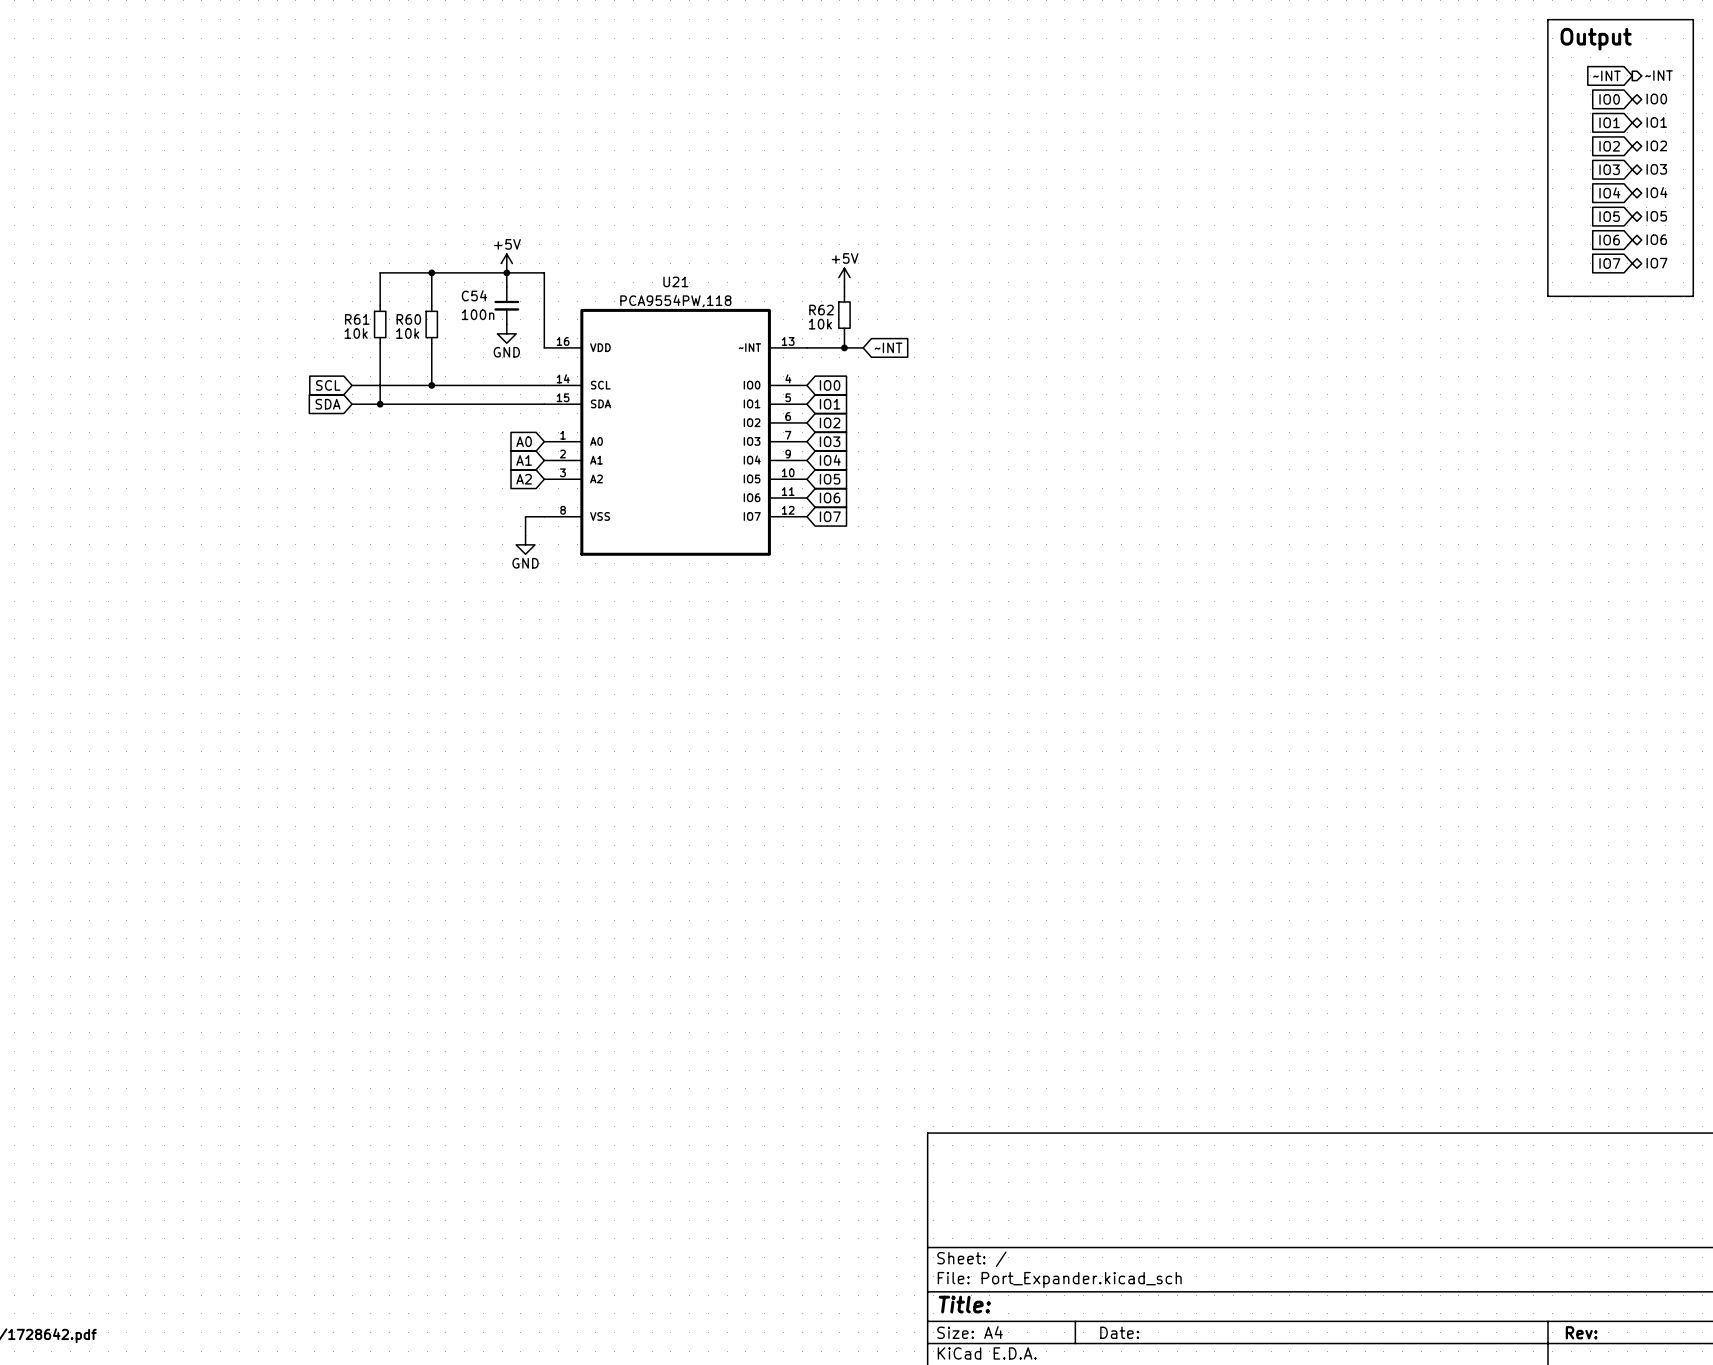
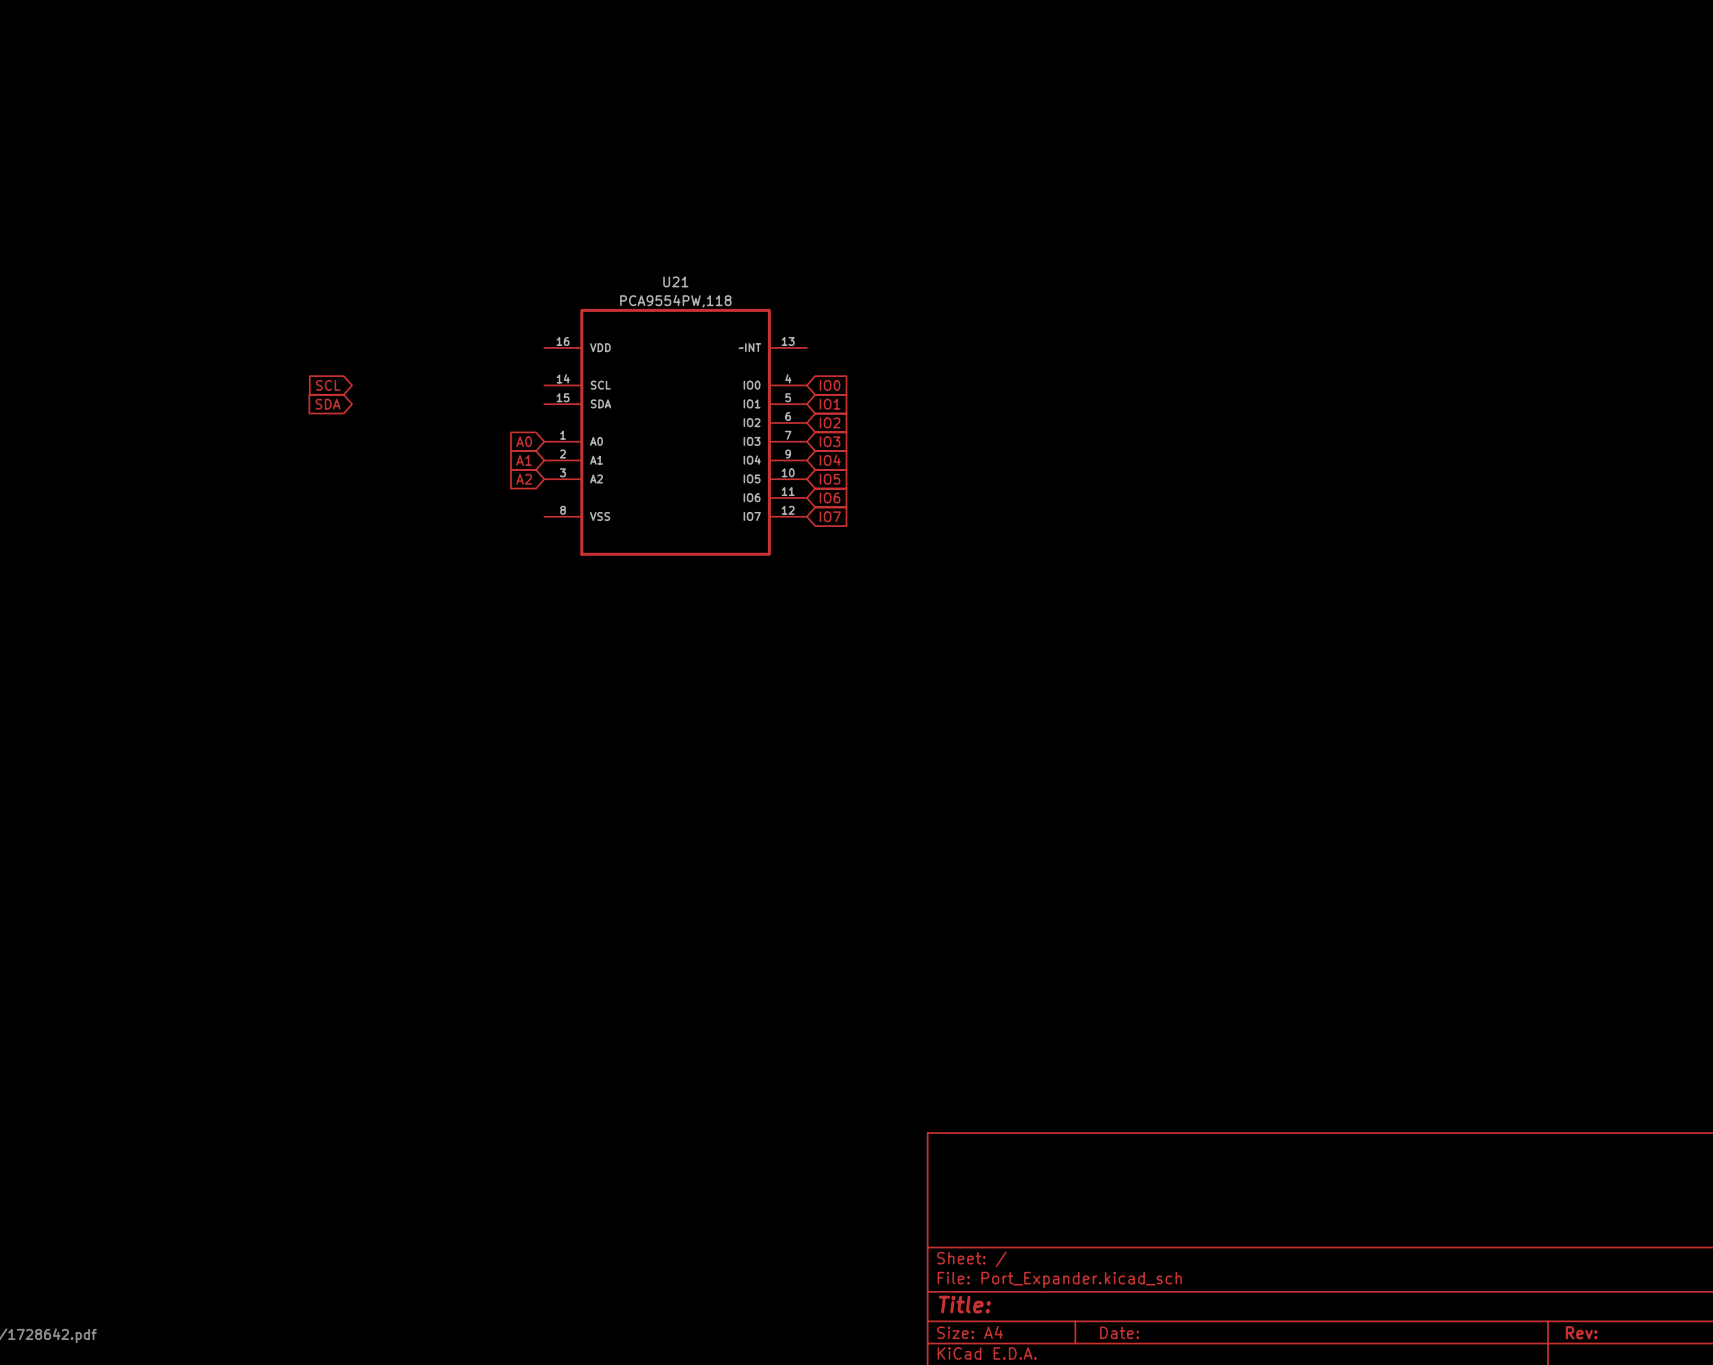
line: (1547, 19) (1693, 19) (1693, 296) (1547, 296) (1547, 19) -> none
text: Output (1596, 39) -> none
global label: ~INT (1606, 75) -> none
hierarchical label: ~INT (1659, 75) -> none
global label: IO0 (1609, 99) -> none
hierarchical label: IO0 (1656, 99) -> none
global label: IO1 (1609, 122) -> none
hierarchical label: IO1 (1656, 122) -> none
hierarchical label: IO2 (1656, 145) -> none
global label: IO2 (1609, 146) -> none
global label: IO3 (1609, 169) -> none
hierarchical label: IO3 (1656, 169) -> none
global label: IO4 (1609, 192) -> none
hierarchical label: IO4 (1657, 192) -> none
global label: IO5 (1609, 216) -> none
hierarchical label: IO5 (1656, 216) -> none
hierarchical label: IO6 (1656, 239) -> none
global label: IO6 (1609, 240) -> none
power symbol: +5V (506, 263) -> none
global label: IO7 (1609, 263) -> none
hierarchical label: IO7 (1657, 263) -> none
wire: (431, 272) (431, 305) -> none
junction: (431, 272) -> none
wire: (506, 272) (506, 286) -> none
junction: (506, 272) -> none
power symbol: +5V (844, 277) -> none
wire: (844, 286) (844, 296) -> none
wire: (380, 305) (380, 272) (544, 272) (544, 347) -> none
C54: 100n (506, 305) -> none
R62: 10k (844, 315) -> none
R61: 10k (380, 324) -> none
R60: 10k (431, 324) -> none
power symbol: GND (506, 333) -> none
wire: (844, 333) (844, 347) -> none
wire: (380, 343) (380, 404) -> none
wire: (431, 343) (431, 385) -> none
wire: (806, 347) (863, 347) -> none
junction: (844, 347) -> none
global label: ~INT (888, 347) -> none
wire: (352, 385) (544, 385) -> none
junction: (431, 385) -> none
wire: (352, 404) (544, 404) -> none
junction: (380, 404) -> none
wire: (544, 516) (525, 516) (525, 535) -> none
power symbol: GND (525, 544) -> none

